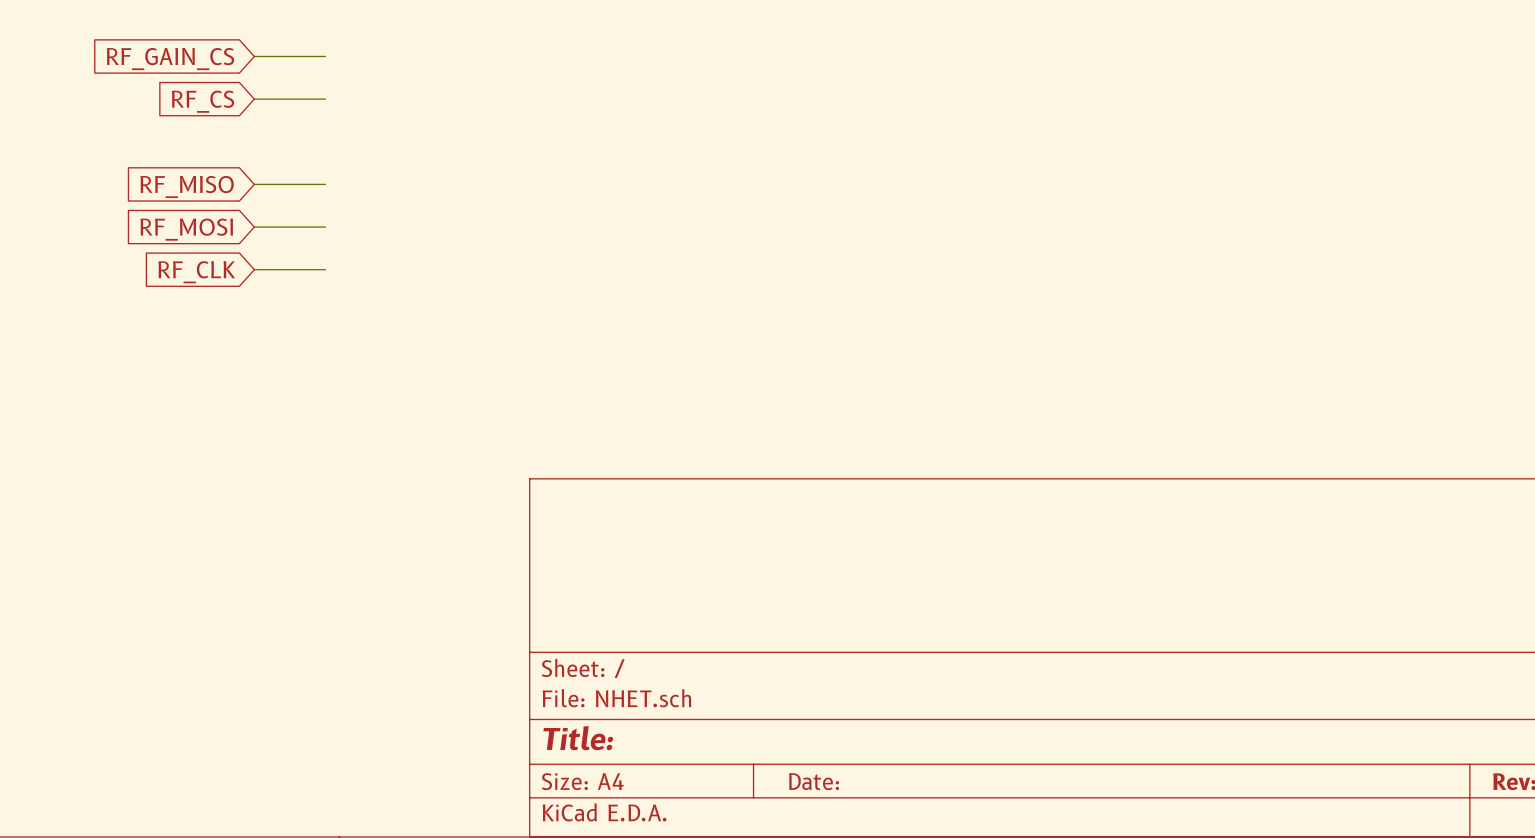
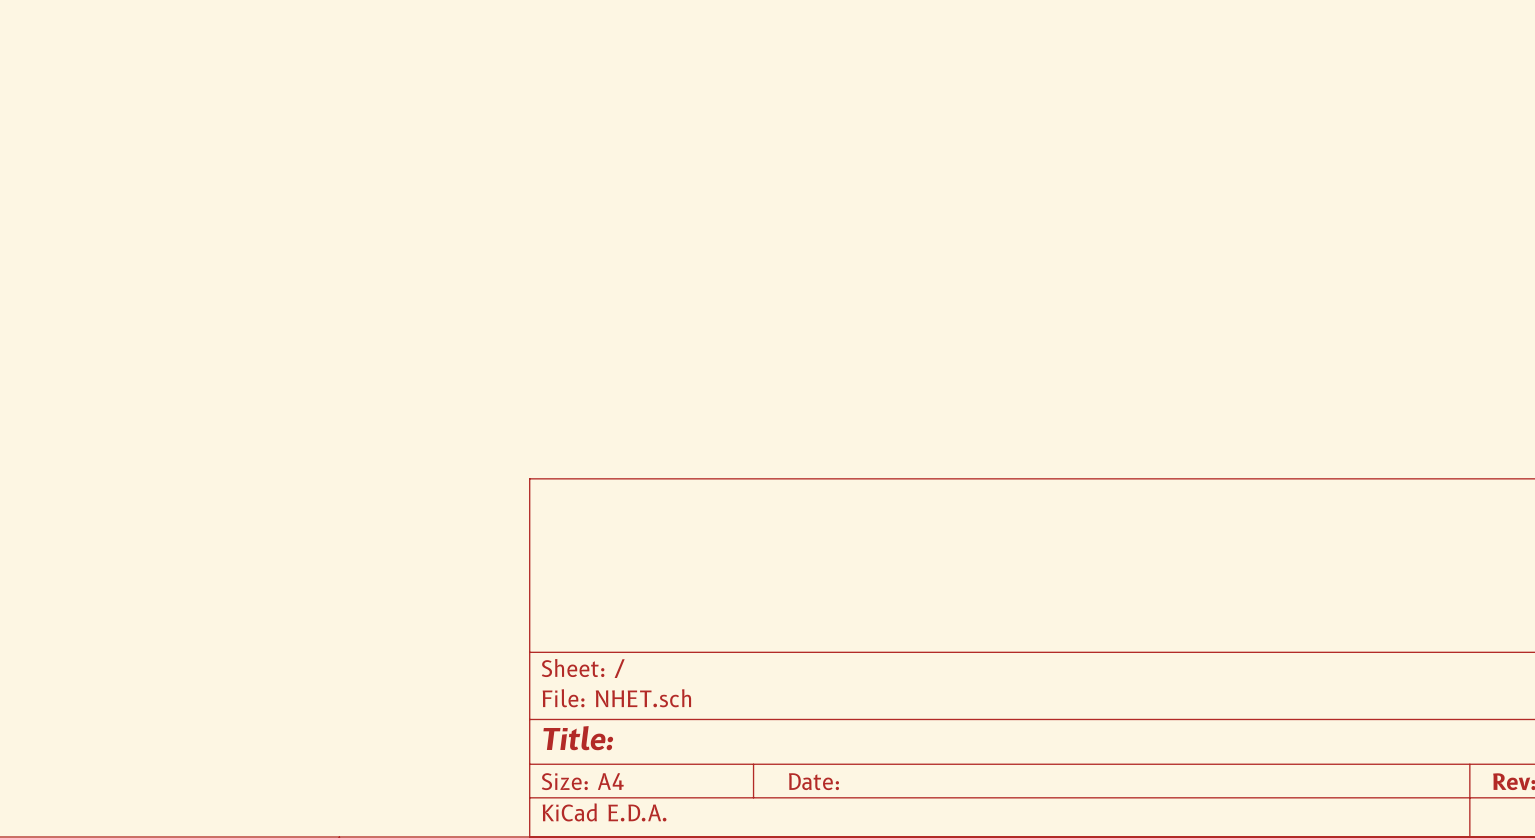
wire: (254, 56) (325, 56) -> none
global label: RF_GAIN_CS (170, 59) -> none
wire: (254, 99) (325, 99) -> none
global label: RF_CS (202, 101) -> none
wire: (254, 184) (325, 184) -> none
global label: RF_MISO (187, 186) -> none
wire: (254, 227) (325, 227) -> none
global label: RF_MOSI (186, 229) -> none
wire: (254, 269) (325, 269) -> none
global label: RF_CLK (196, 272) -> none

